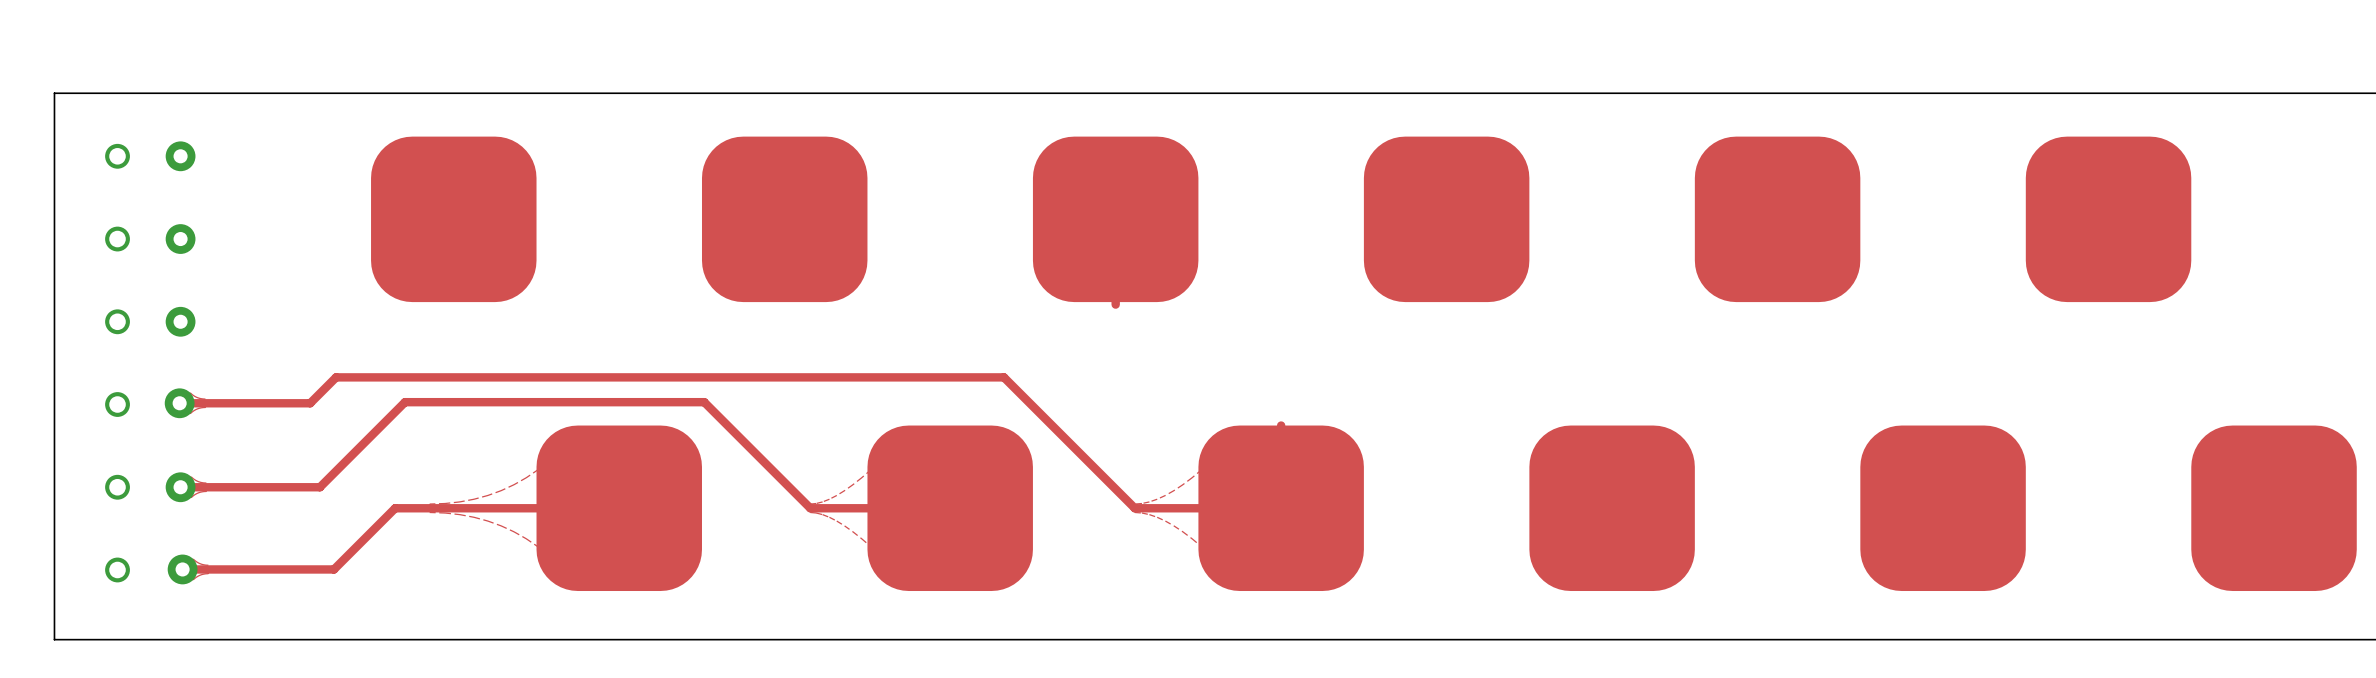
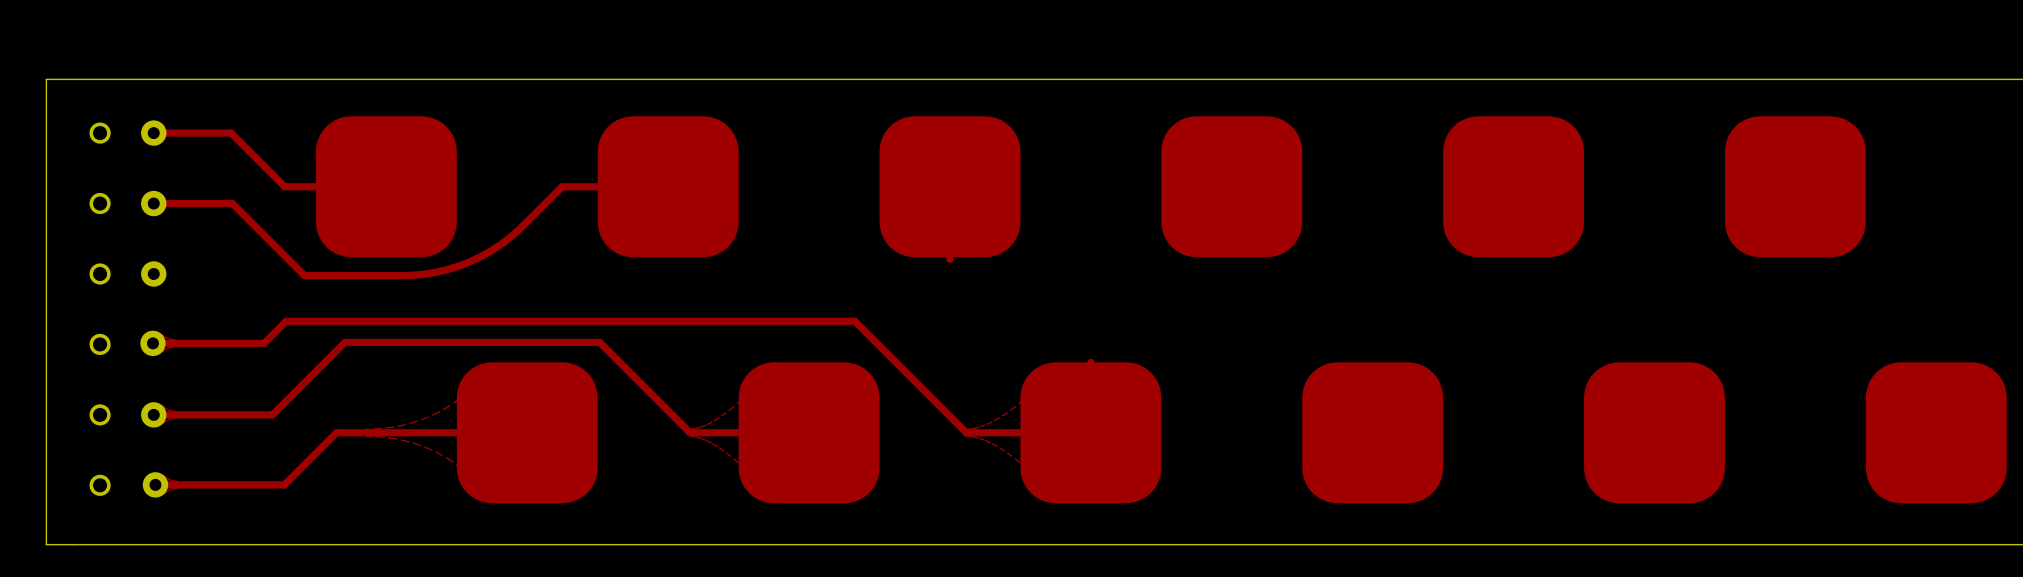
top track: none -> (153, 133) (231, 133) (284, 186) (386, 186)
top track: none -> (668, 186) (562, 186) (517, 231) (490, 251) (452, 268) (411, 275) (304, 275) (232, 203) (153, 203)

